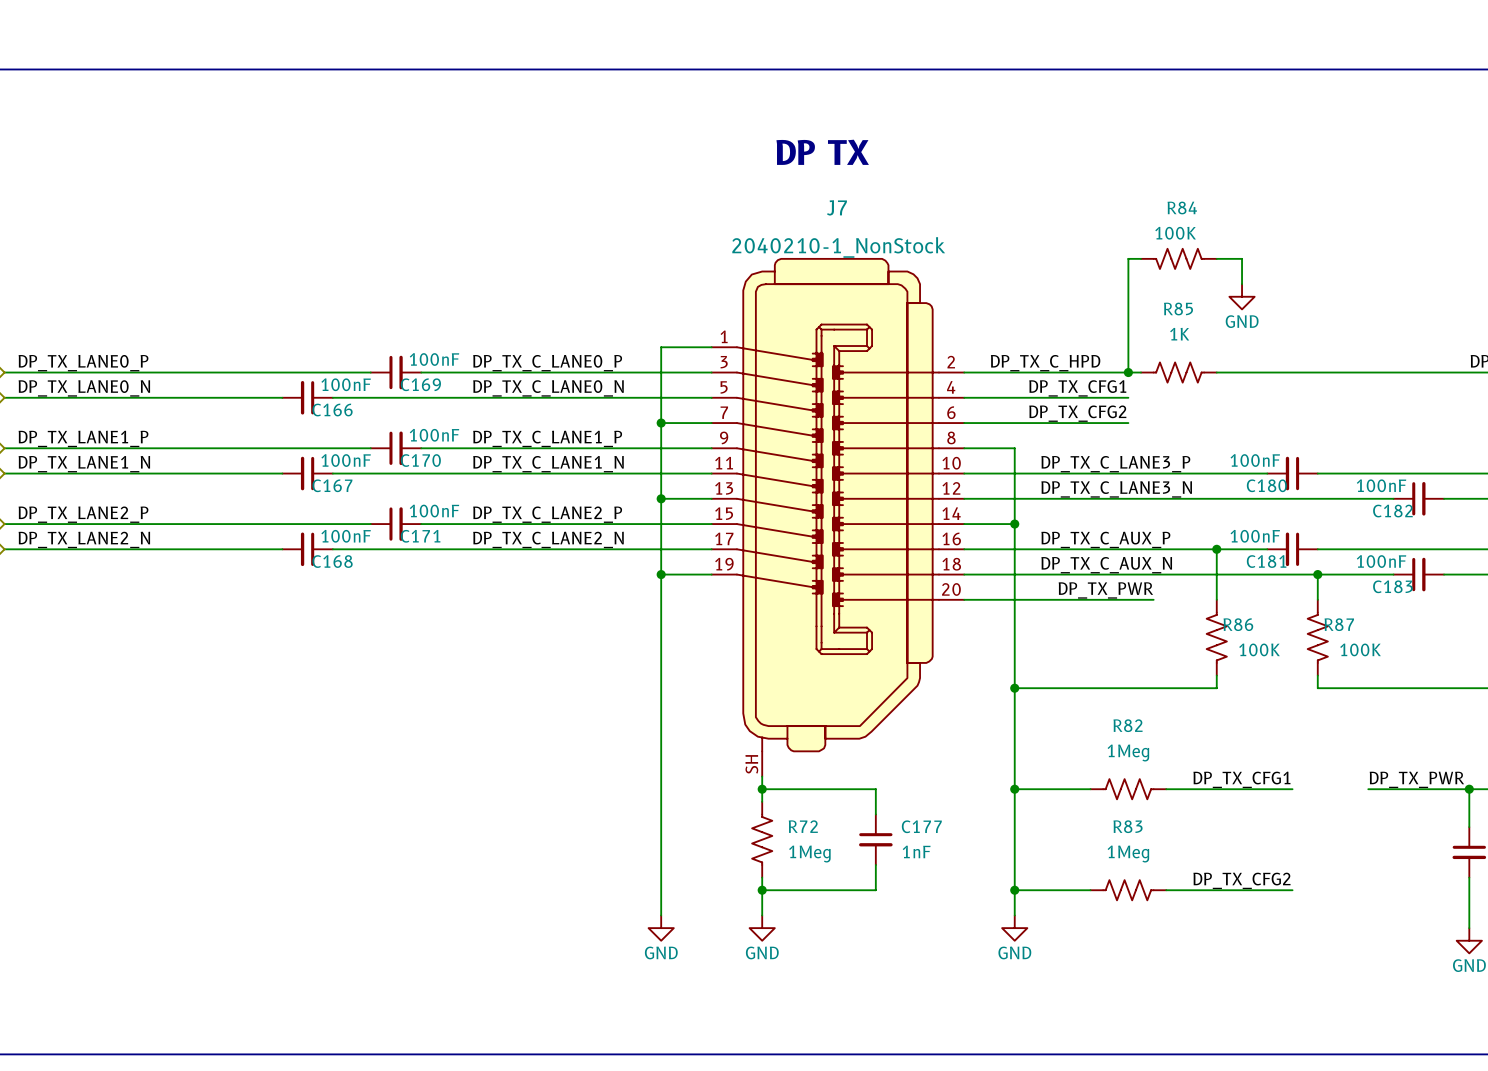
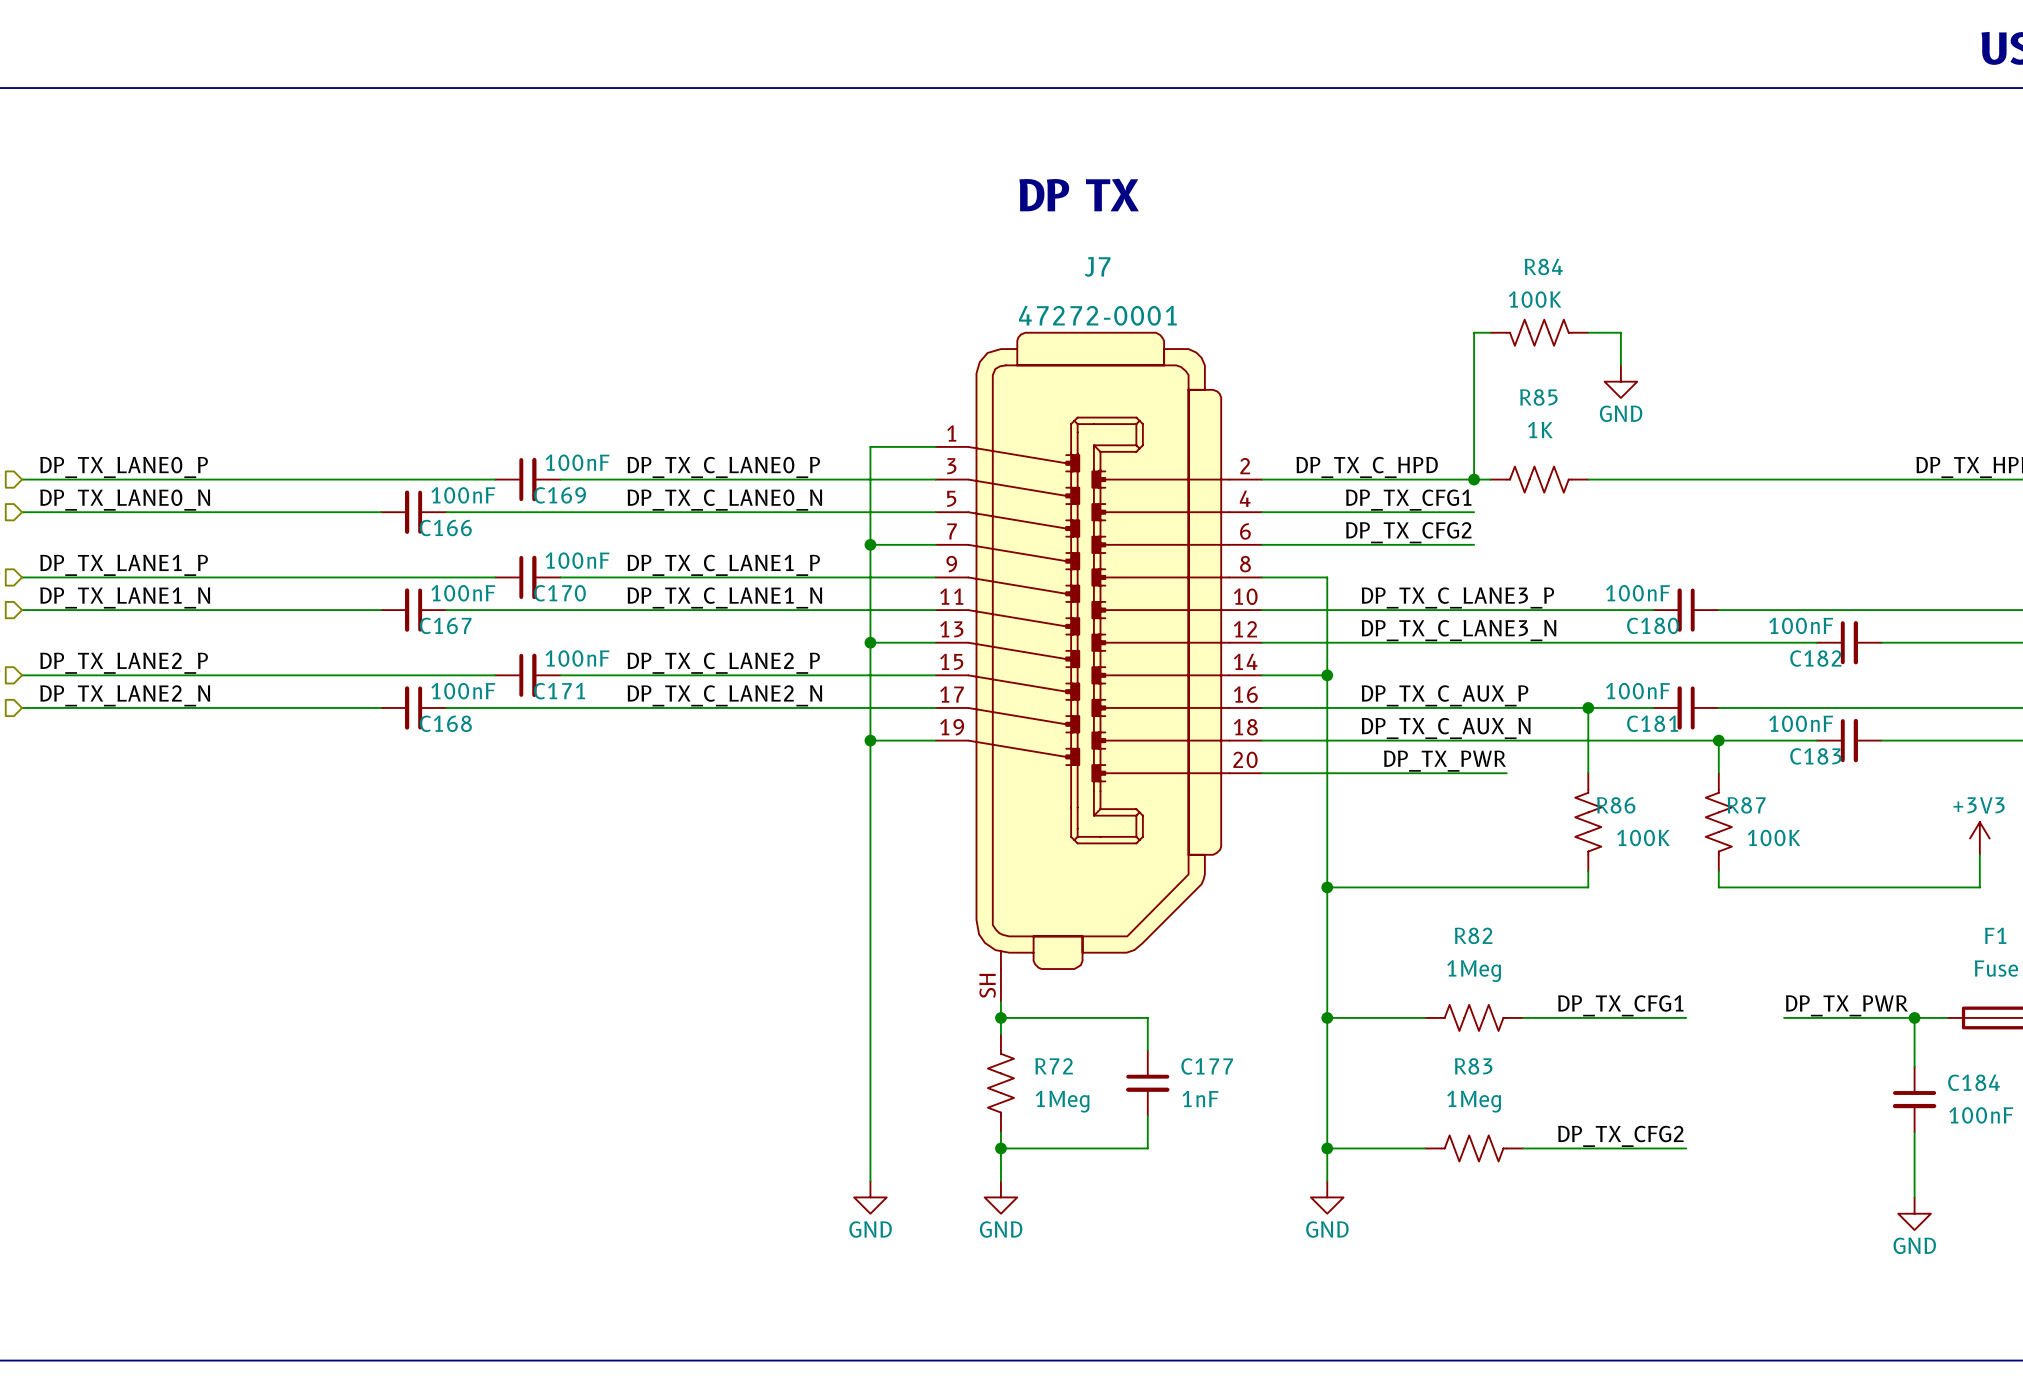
J7 value: 2040210-1_NonStock (838, 247) -> 47272-0001 (1097, 315)

